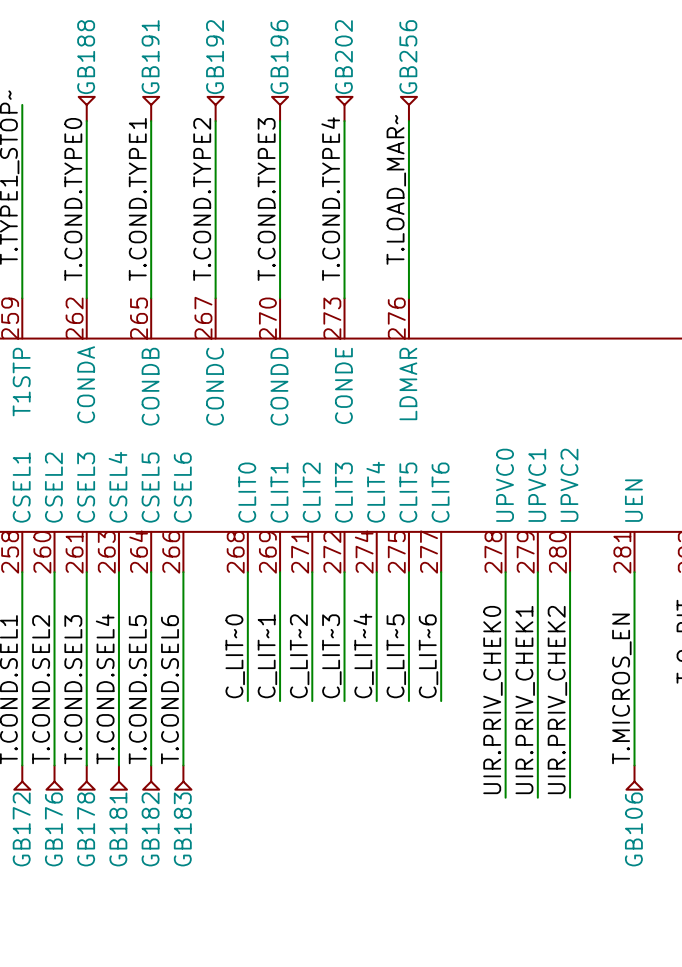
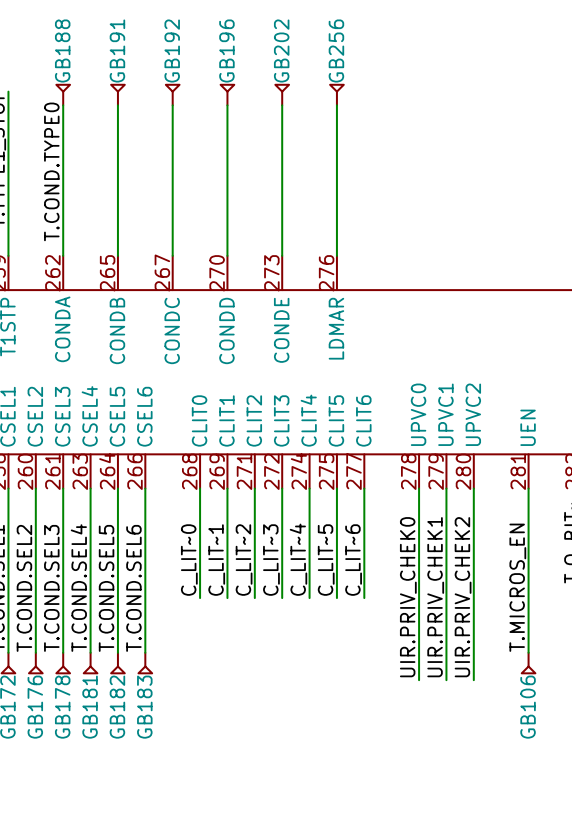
label: T.LOAD_MAR~ (396, 189) -> none
label: T.COND.TYPE1 (137, 199) -> none
label: T.COND.TYPE2 (202, 199) -> none
label: T.COND.TYPE3 (266, 199) -> none
label: T.COND.TYPE4 (330, 199) -> none

